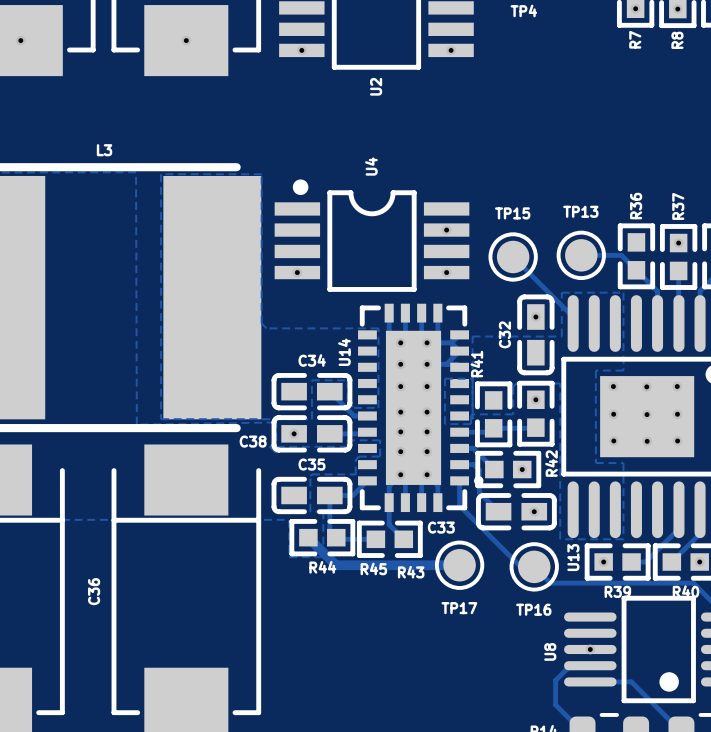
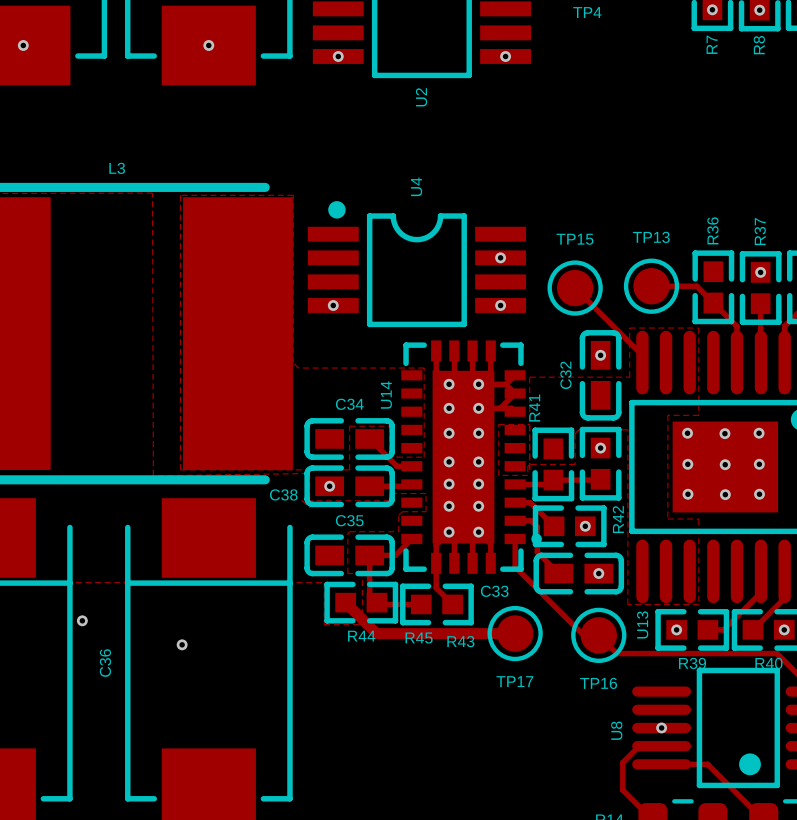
via: none -> (82, 620)
via: none -> (182, 644)

